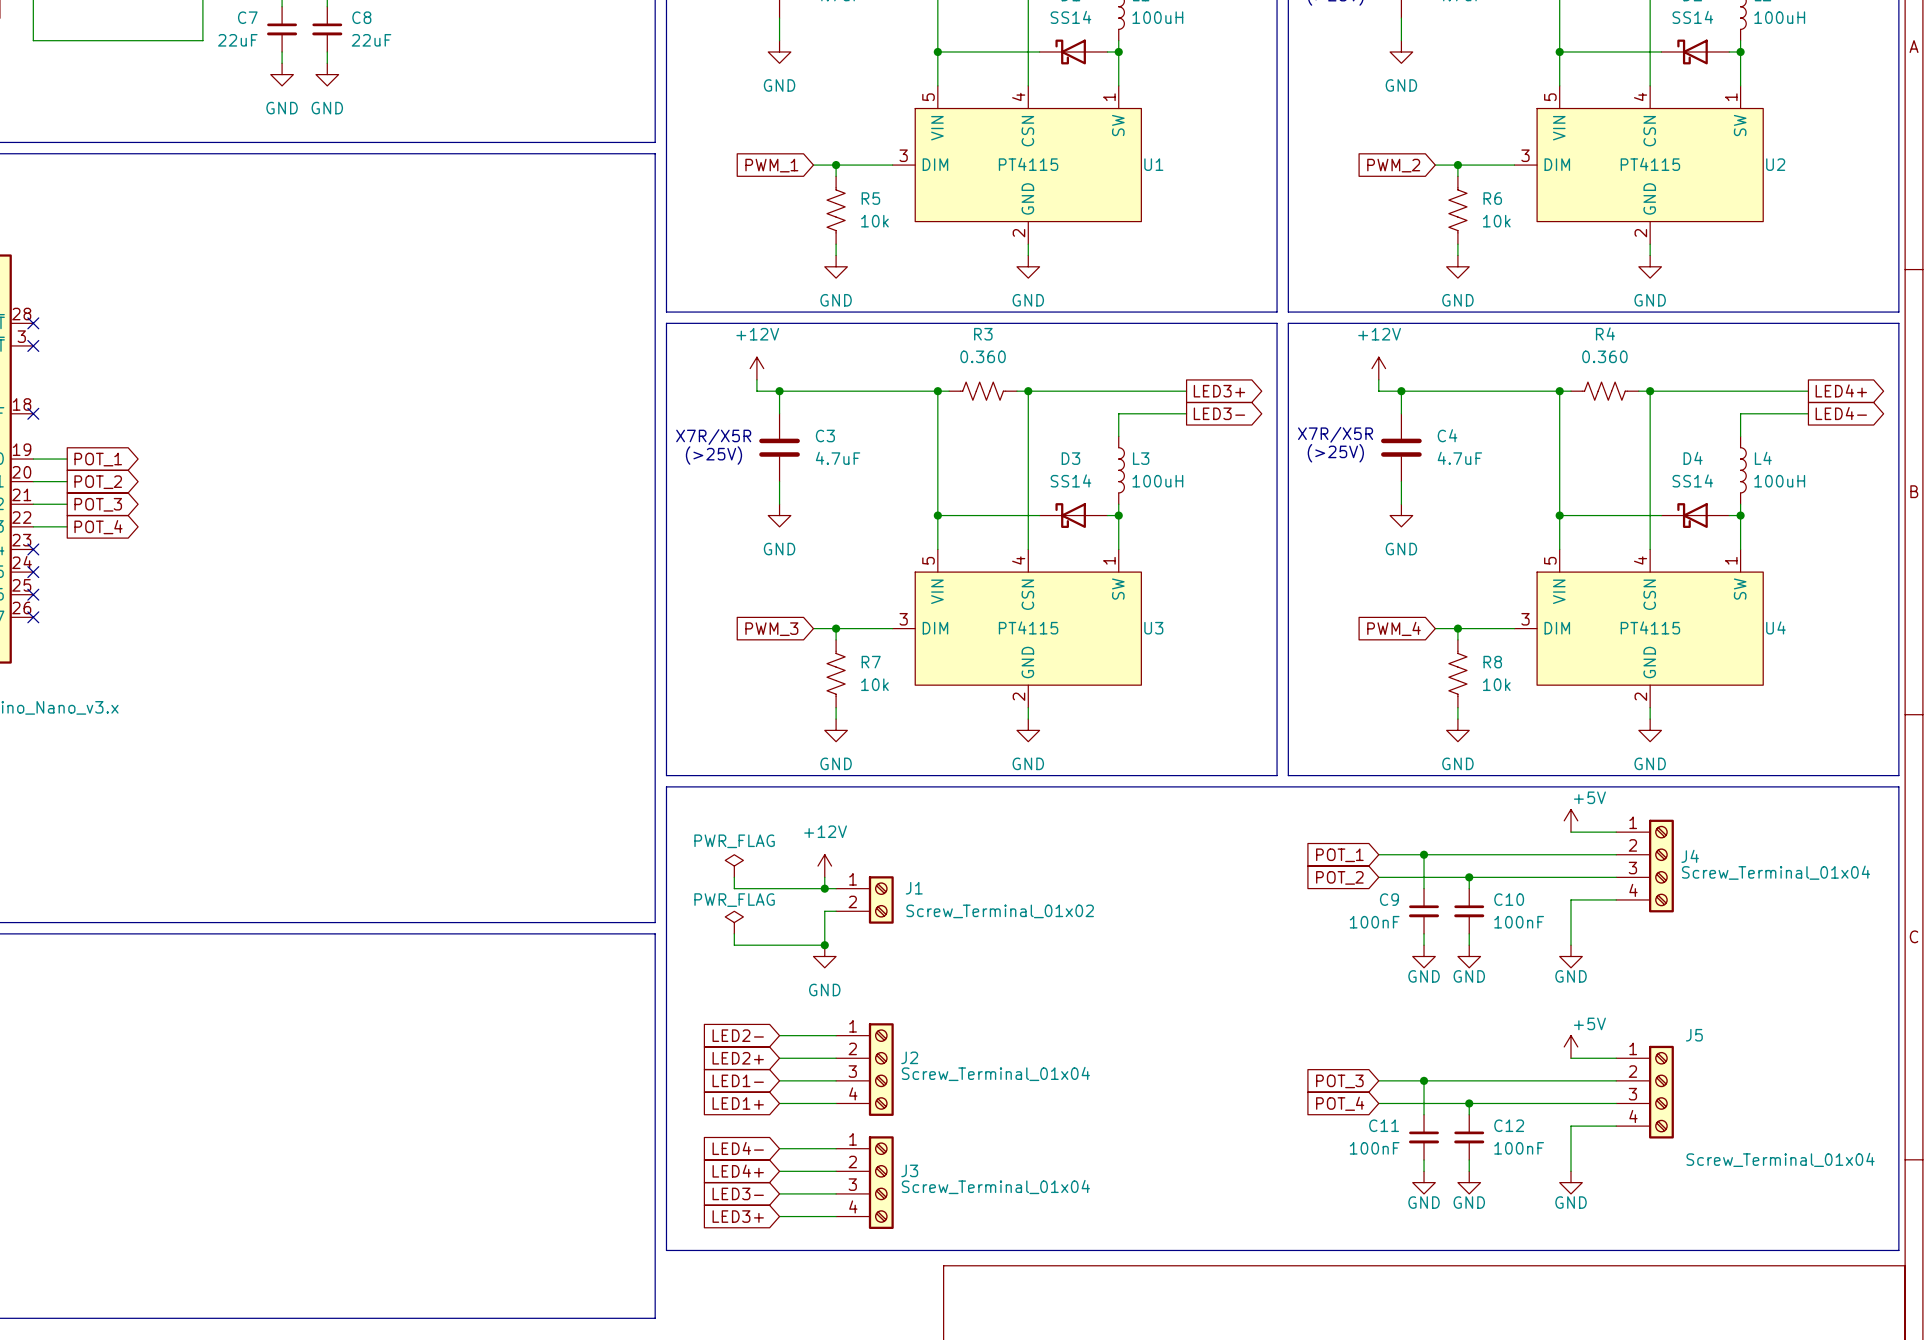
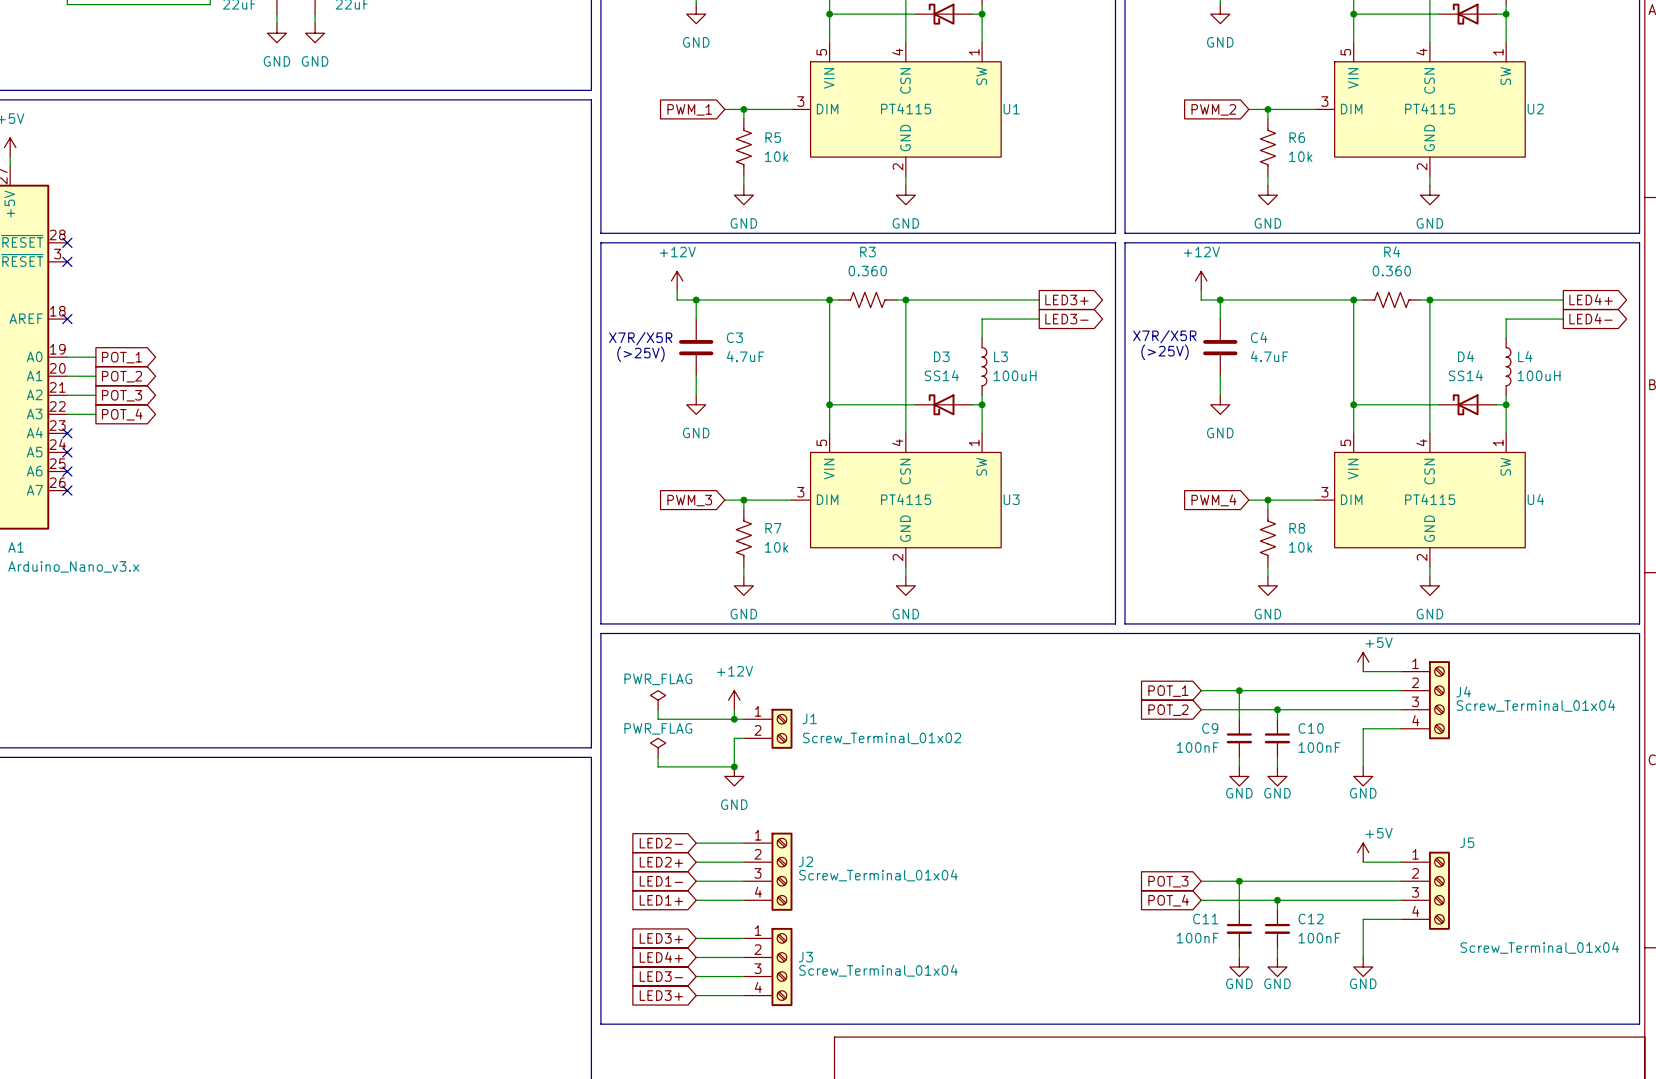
global label: LED4- (738, 1148) -> LED3+ (661, 938)

